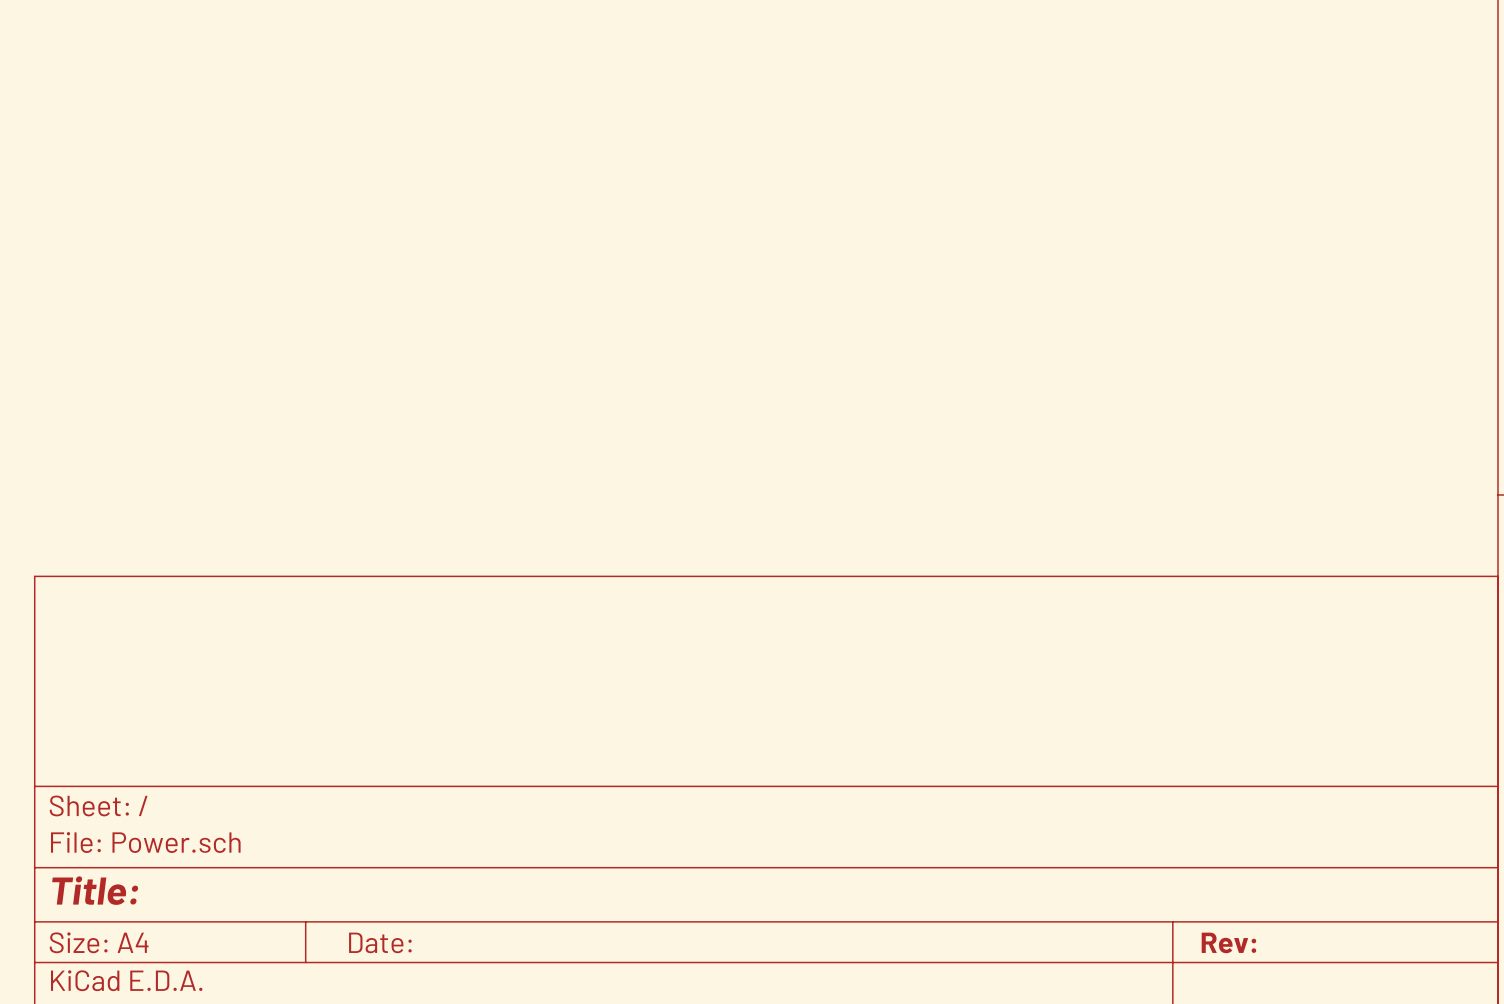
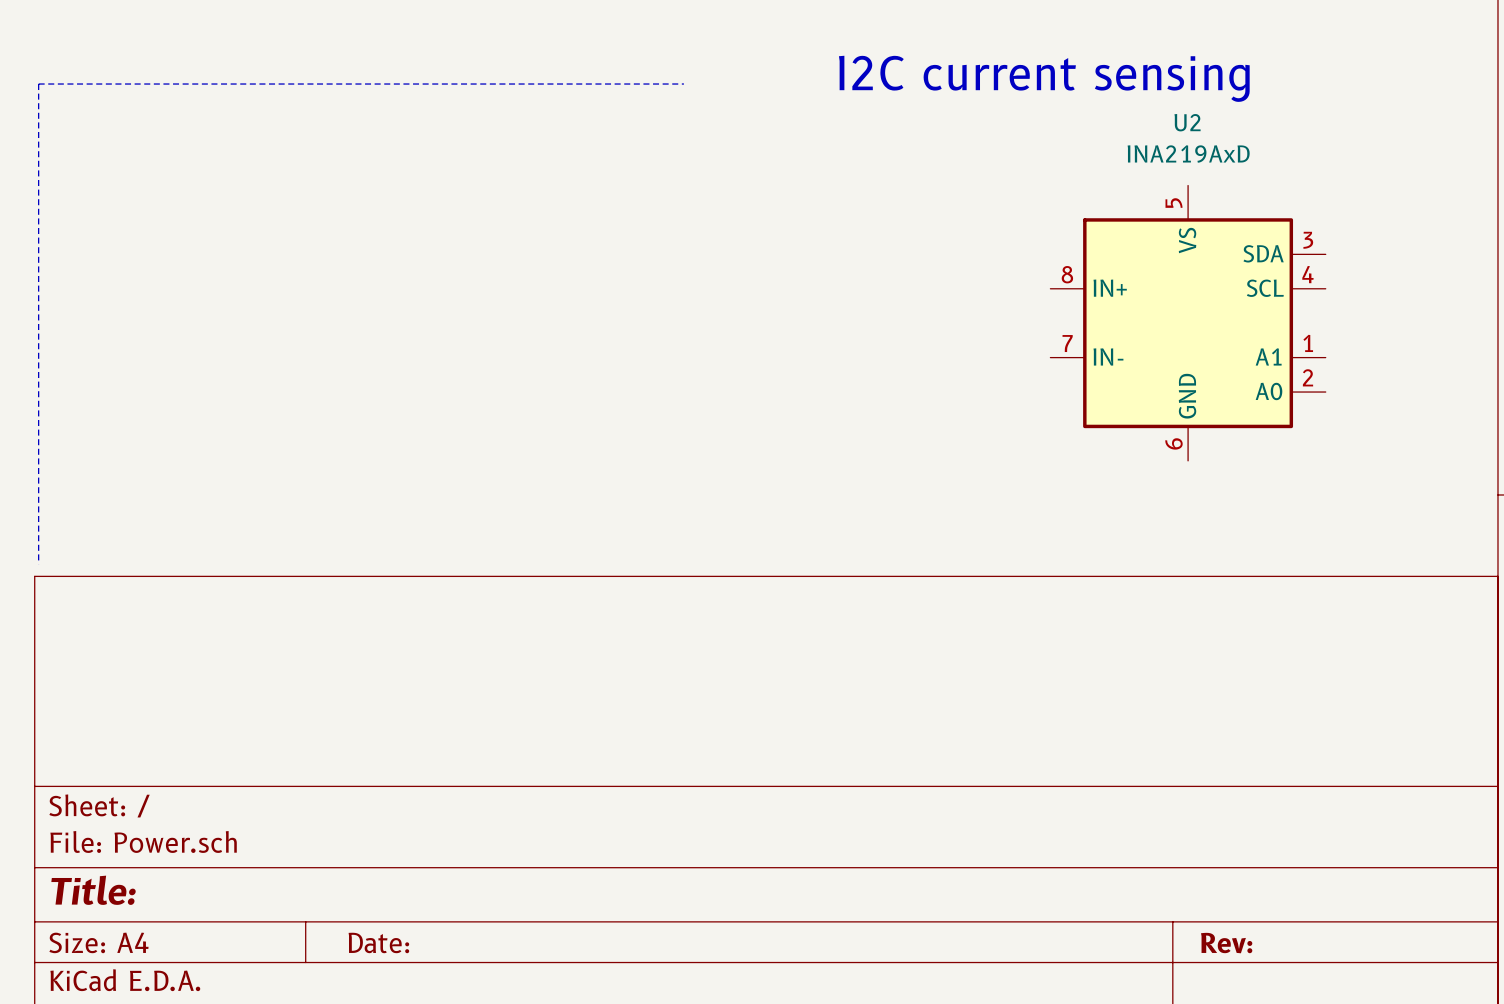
text: none -> I2C current sensing (1044, 78)
line: none -> (683, 84) (38, 84) (38, 564)
U2: none -> INA219AxD (1188, 323)

